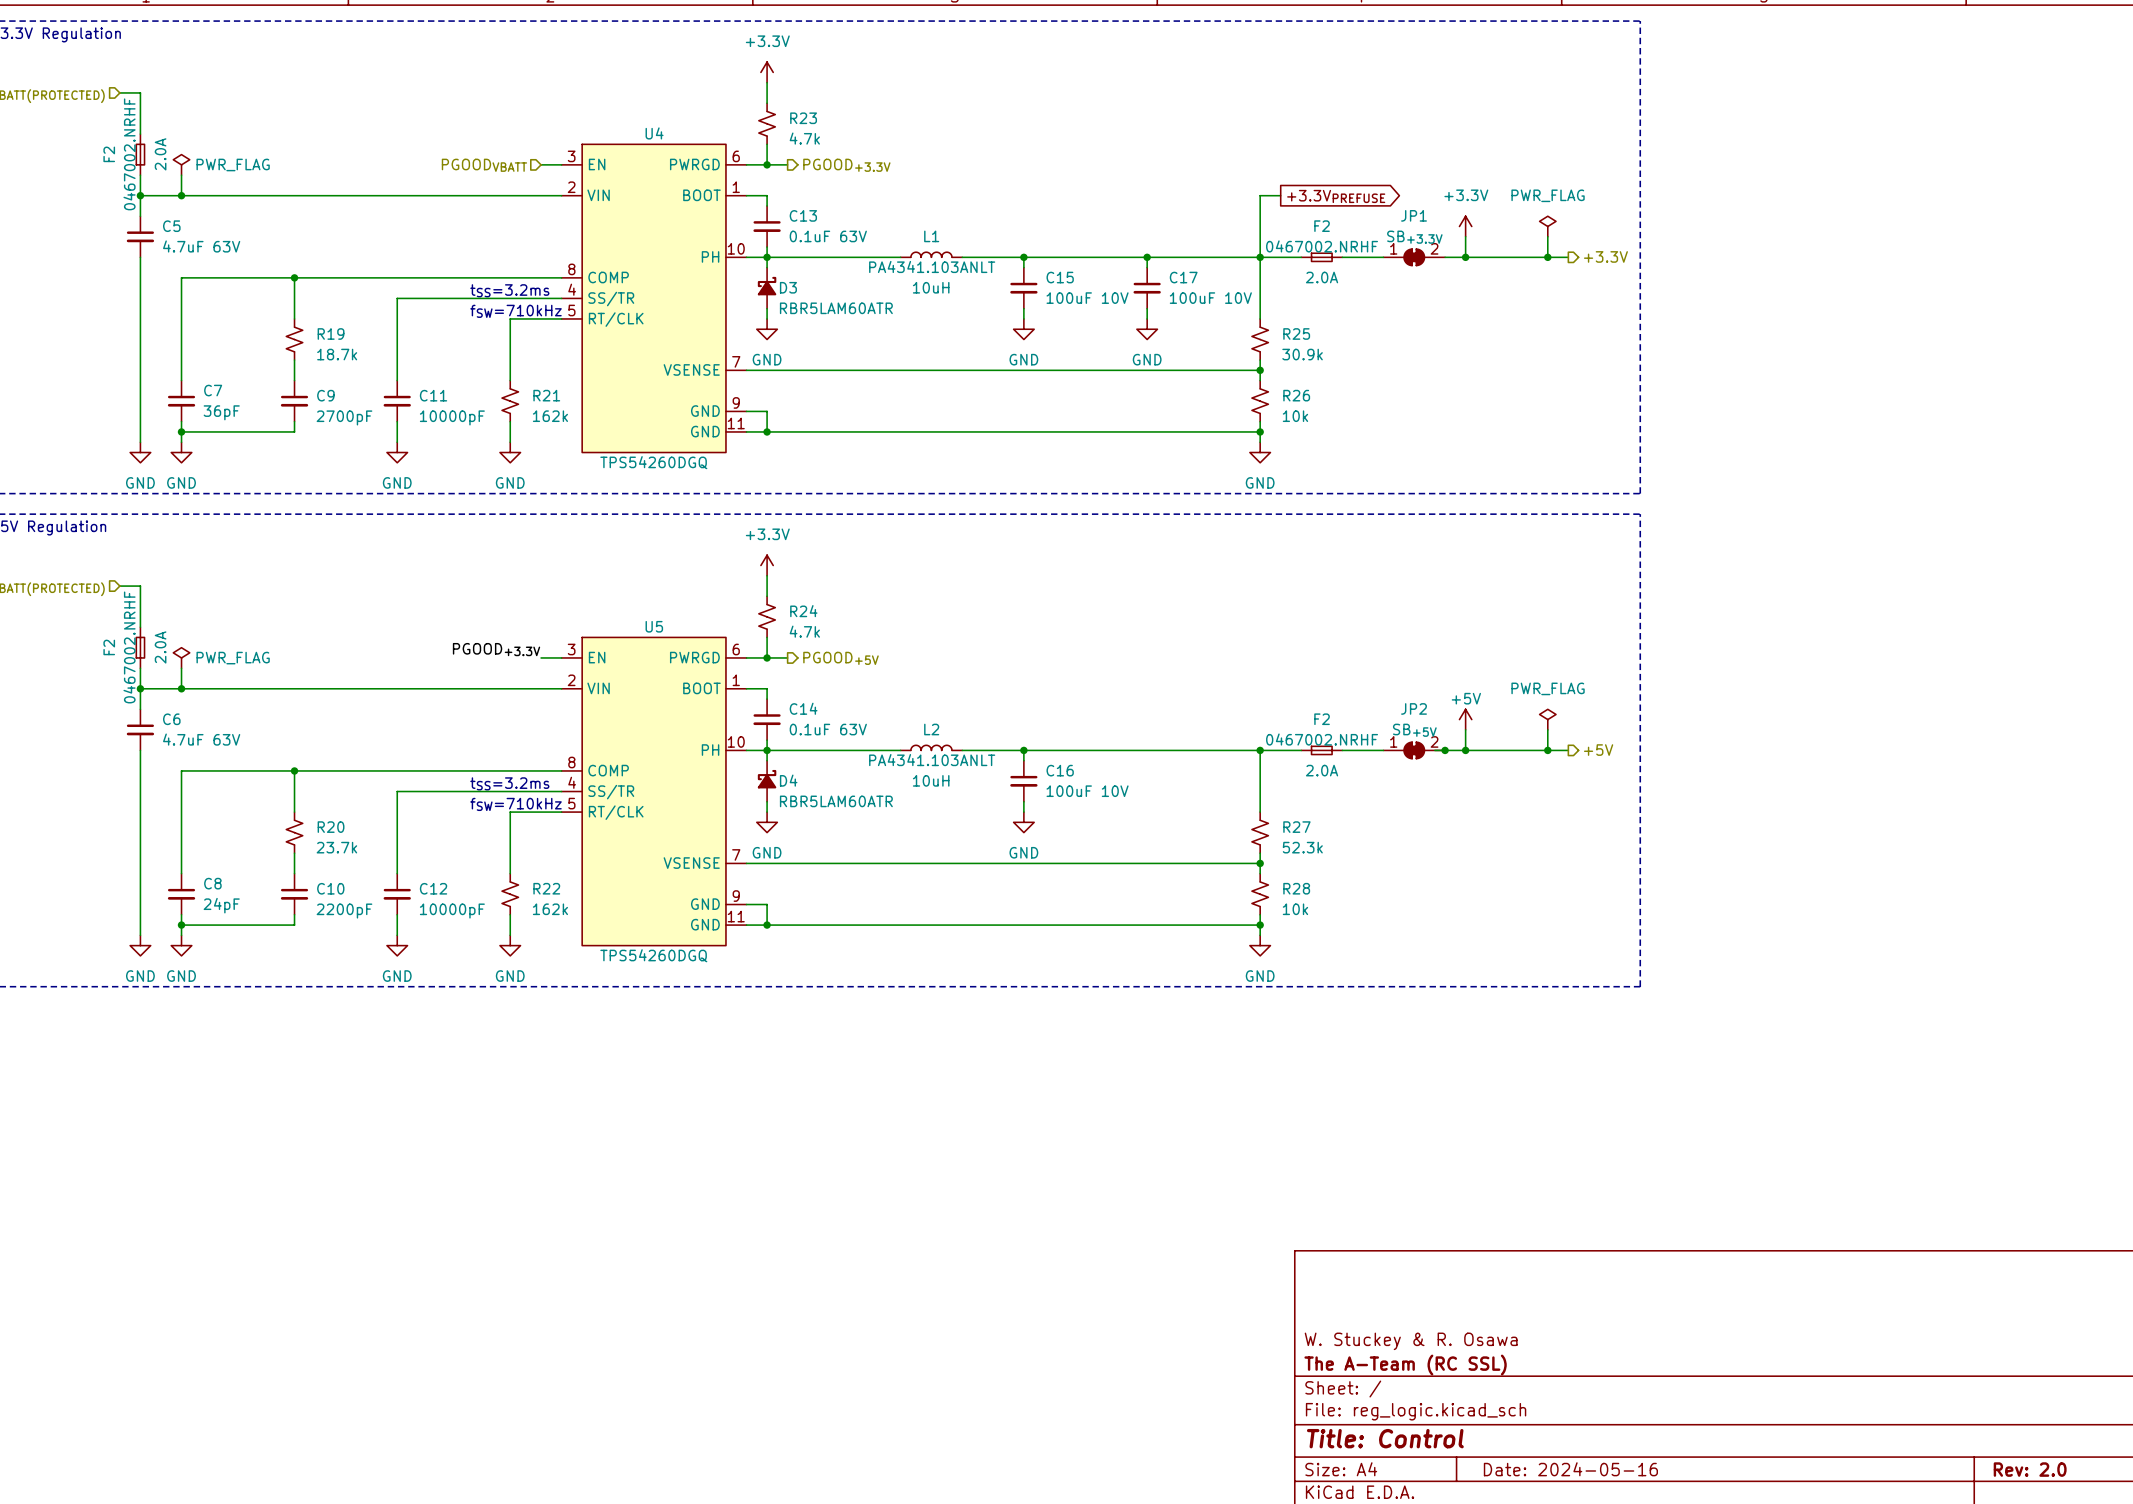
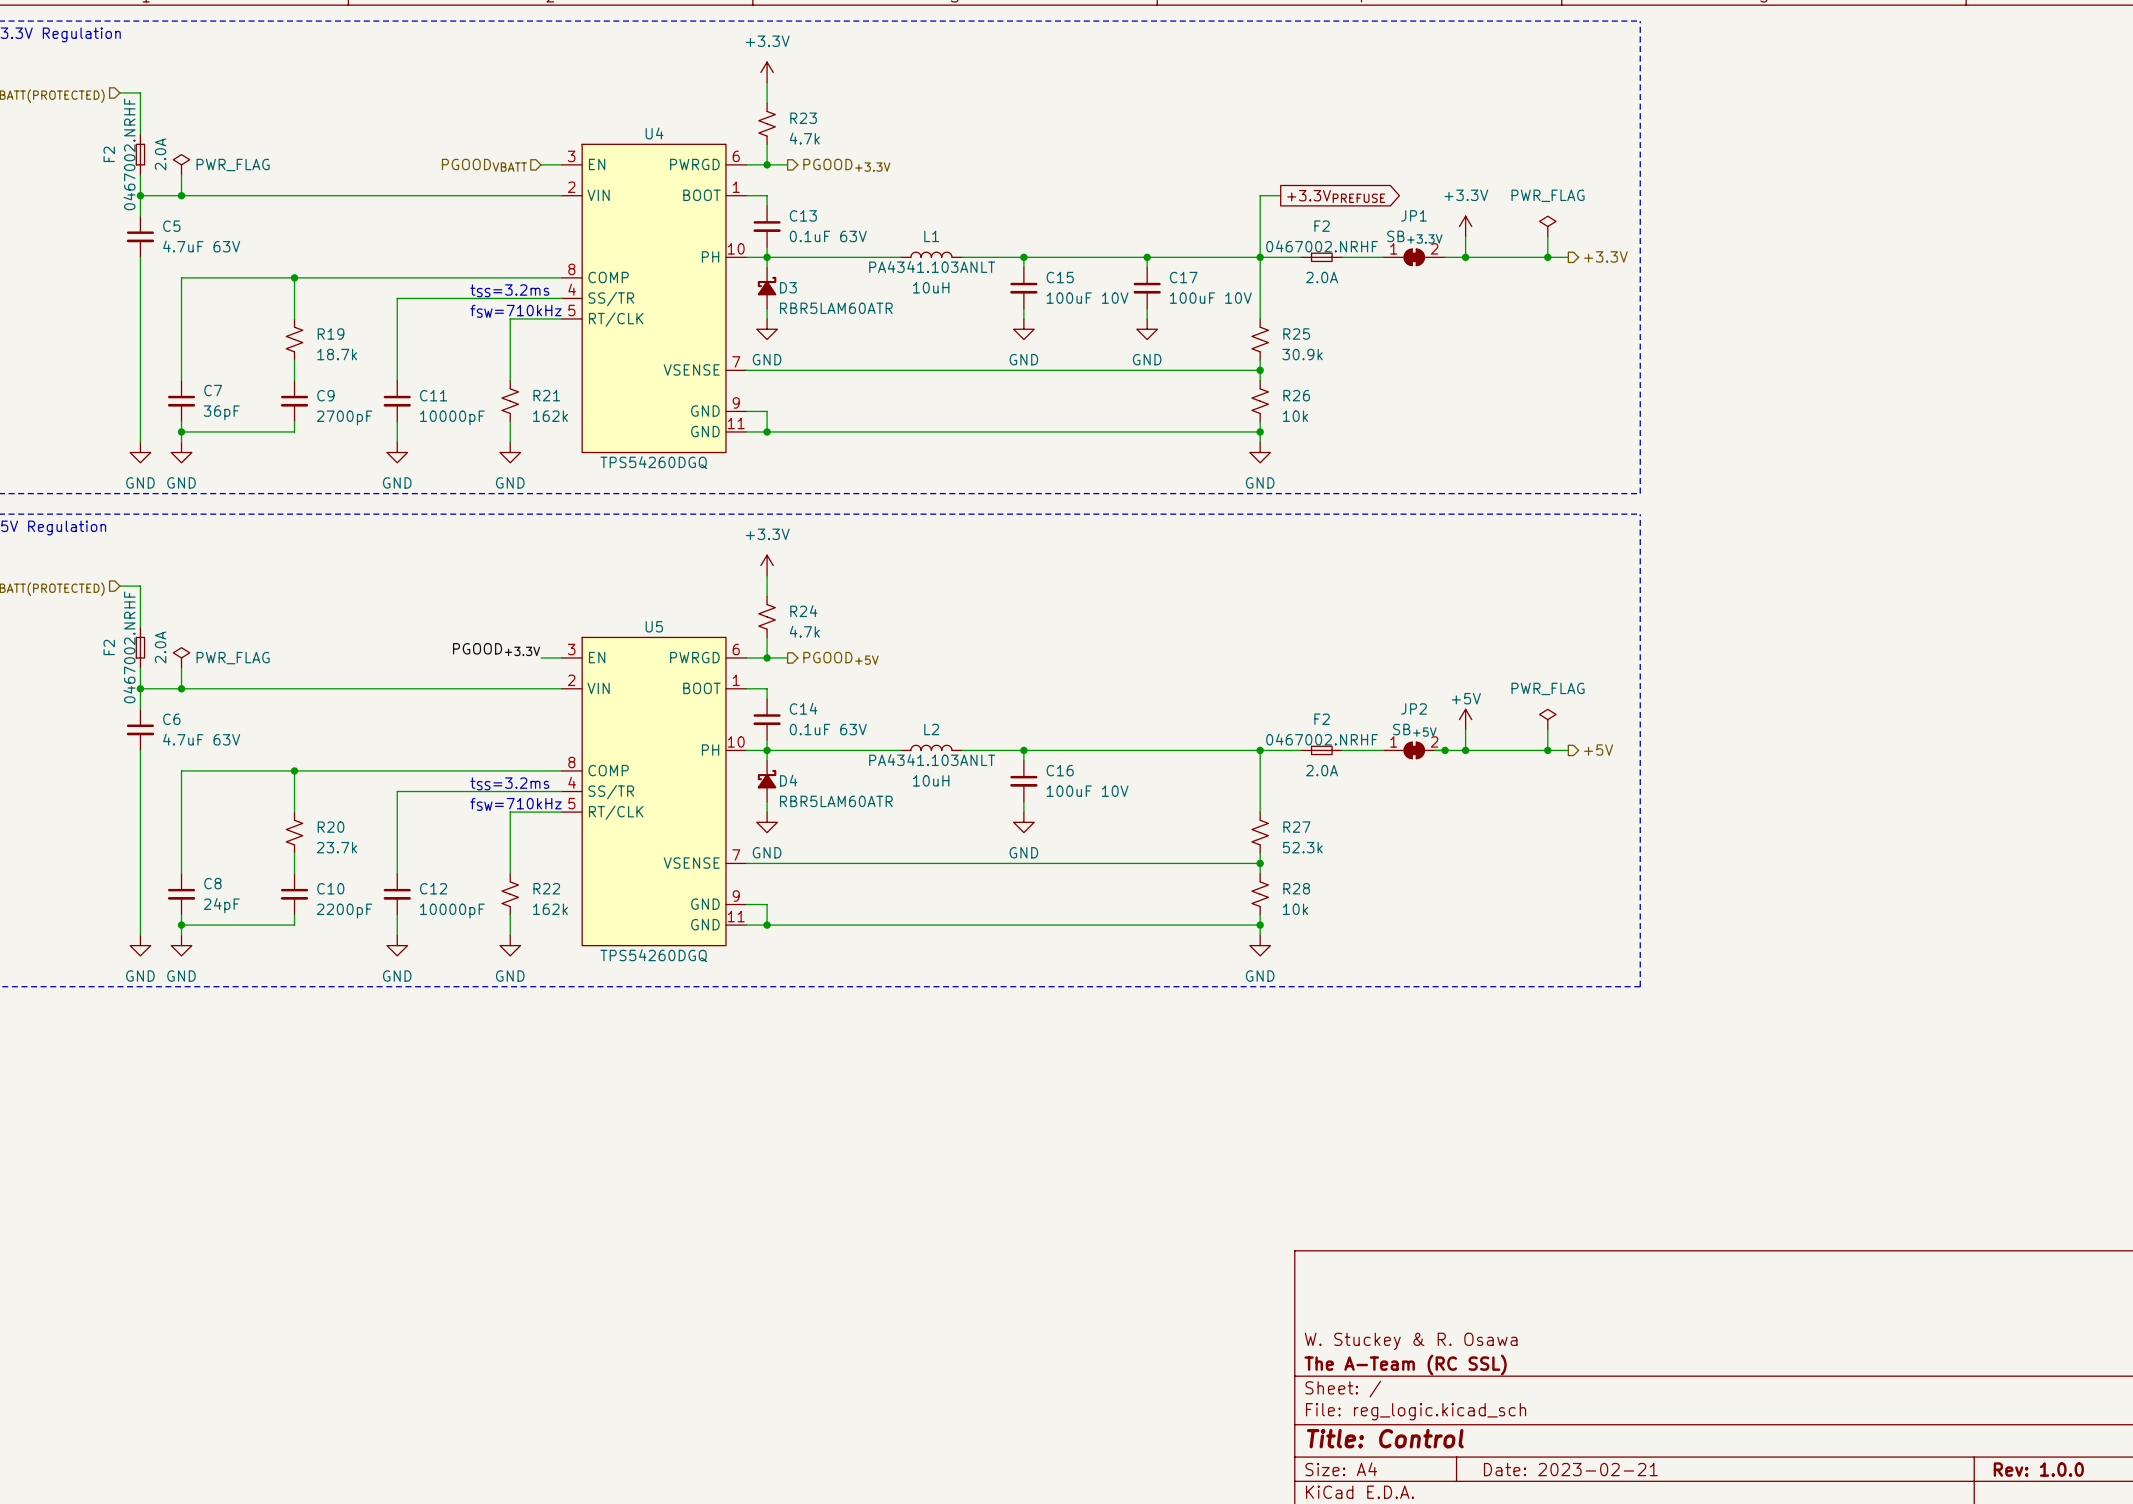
title block: Date: 2024-05-16 (1570, 1469) -> Date: 2023-02-21 (1570, 1469)
title block: Rev: 2.0 (2030, 1469) -> Rev: 1.0.0 (2038, 1469)

